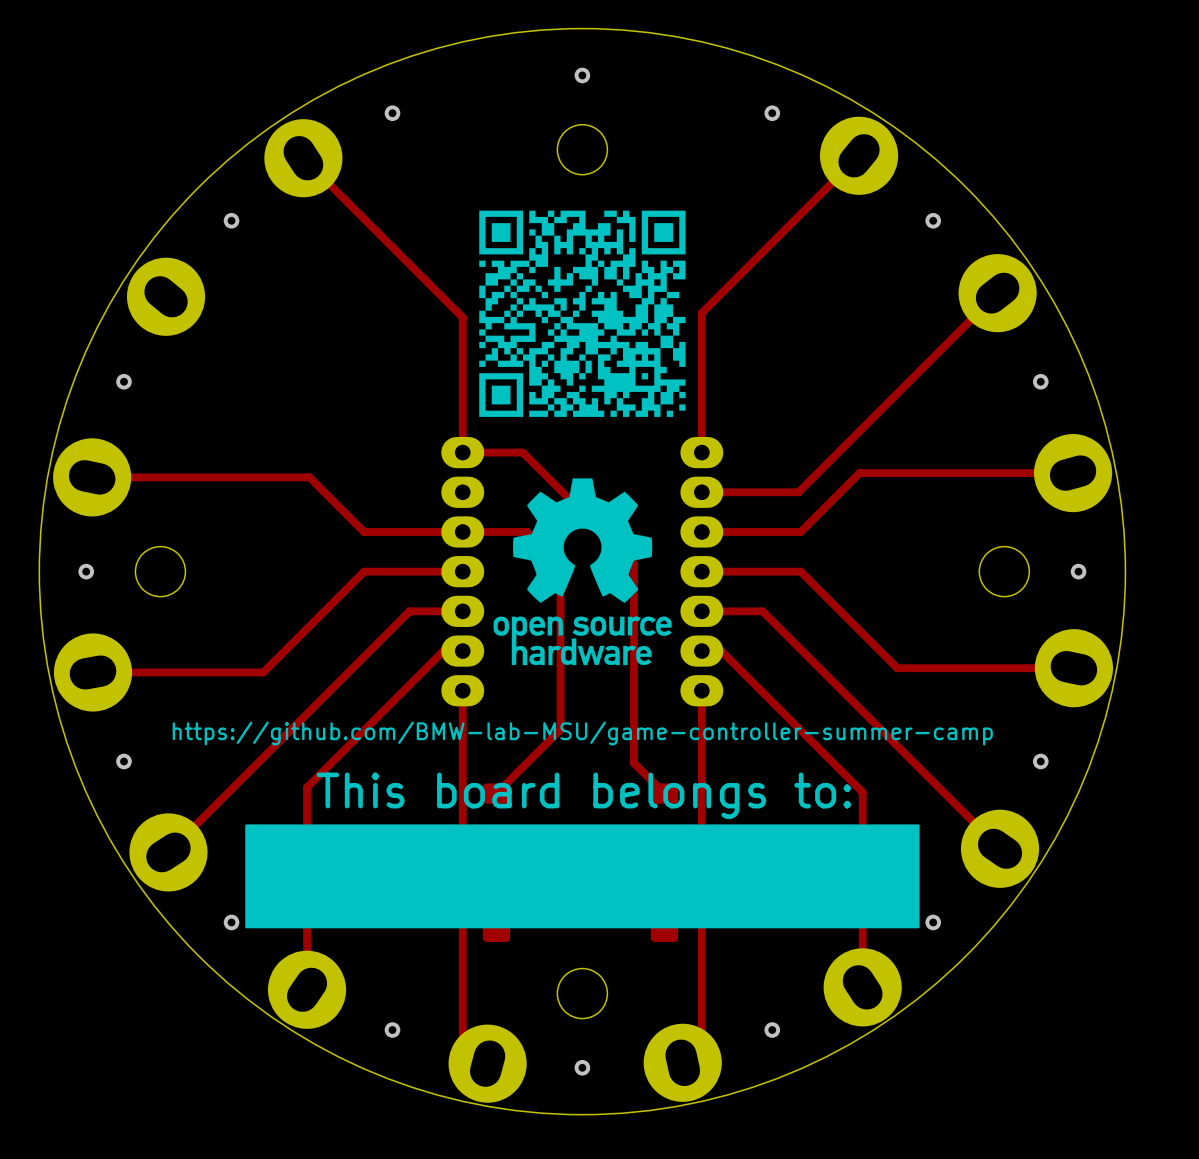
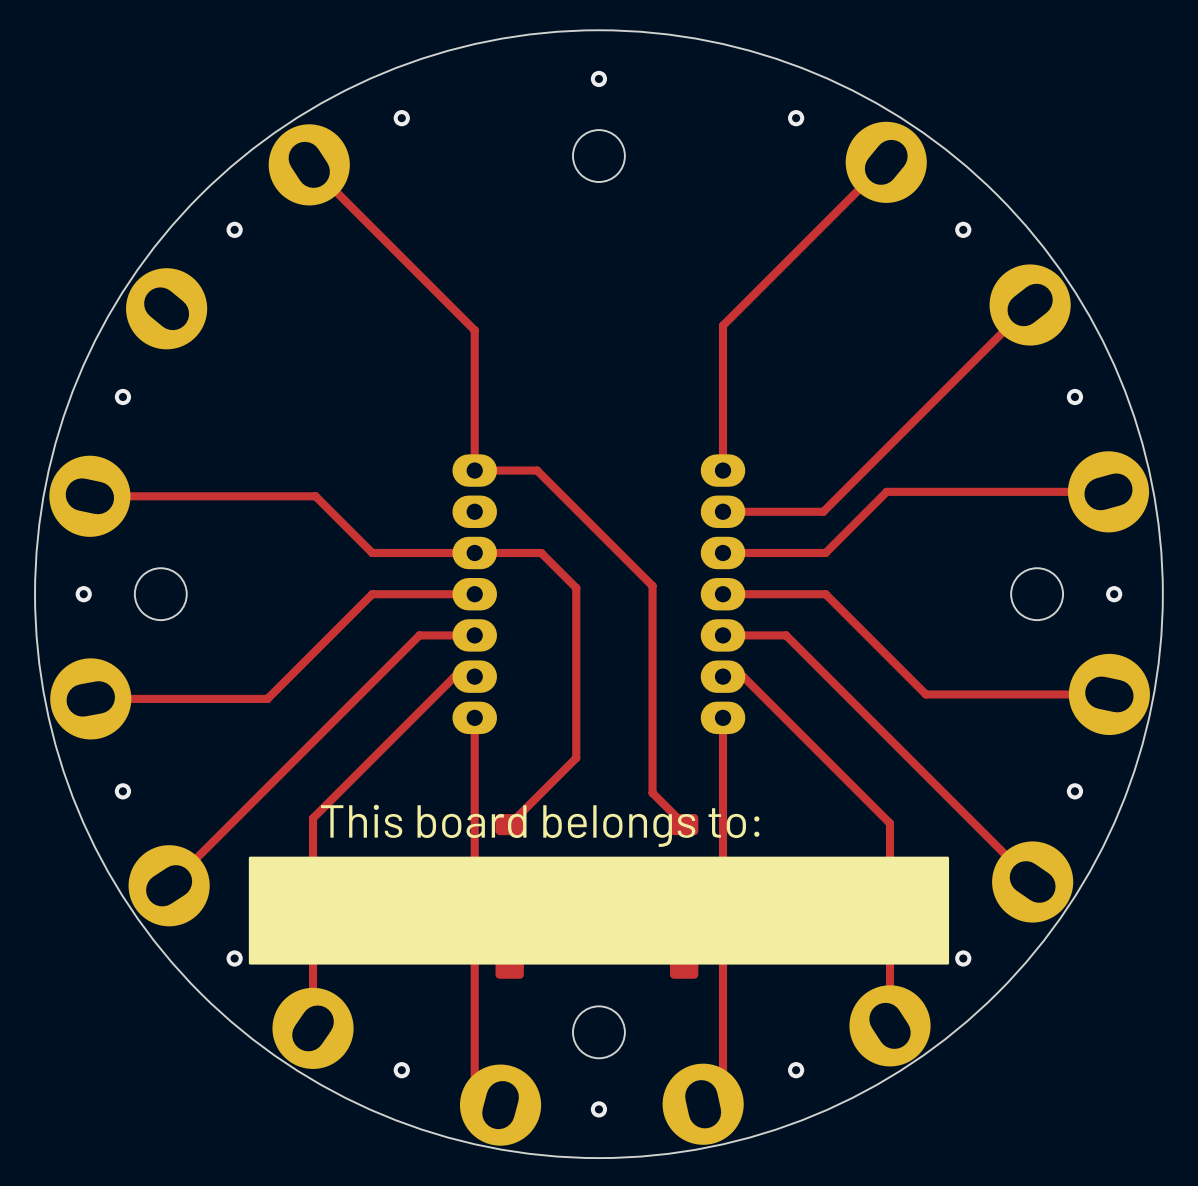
drawing: [479, 210, 686, 666] -> none

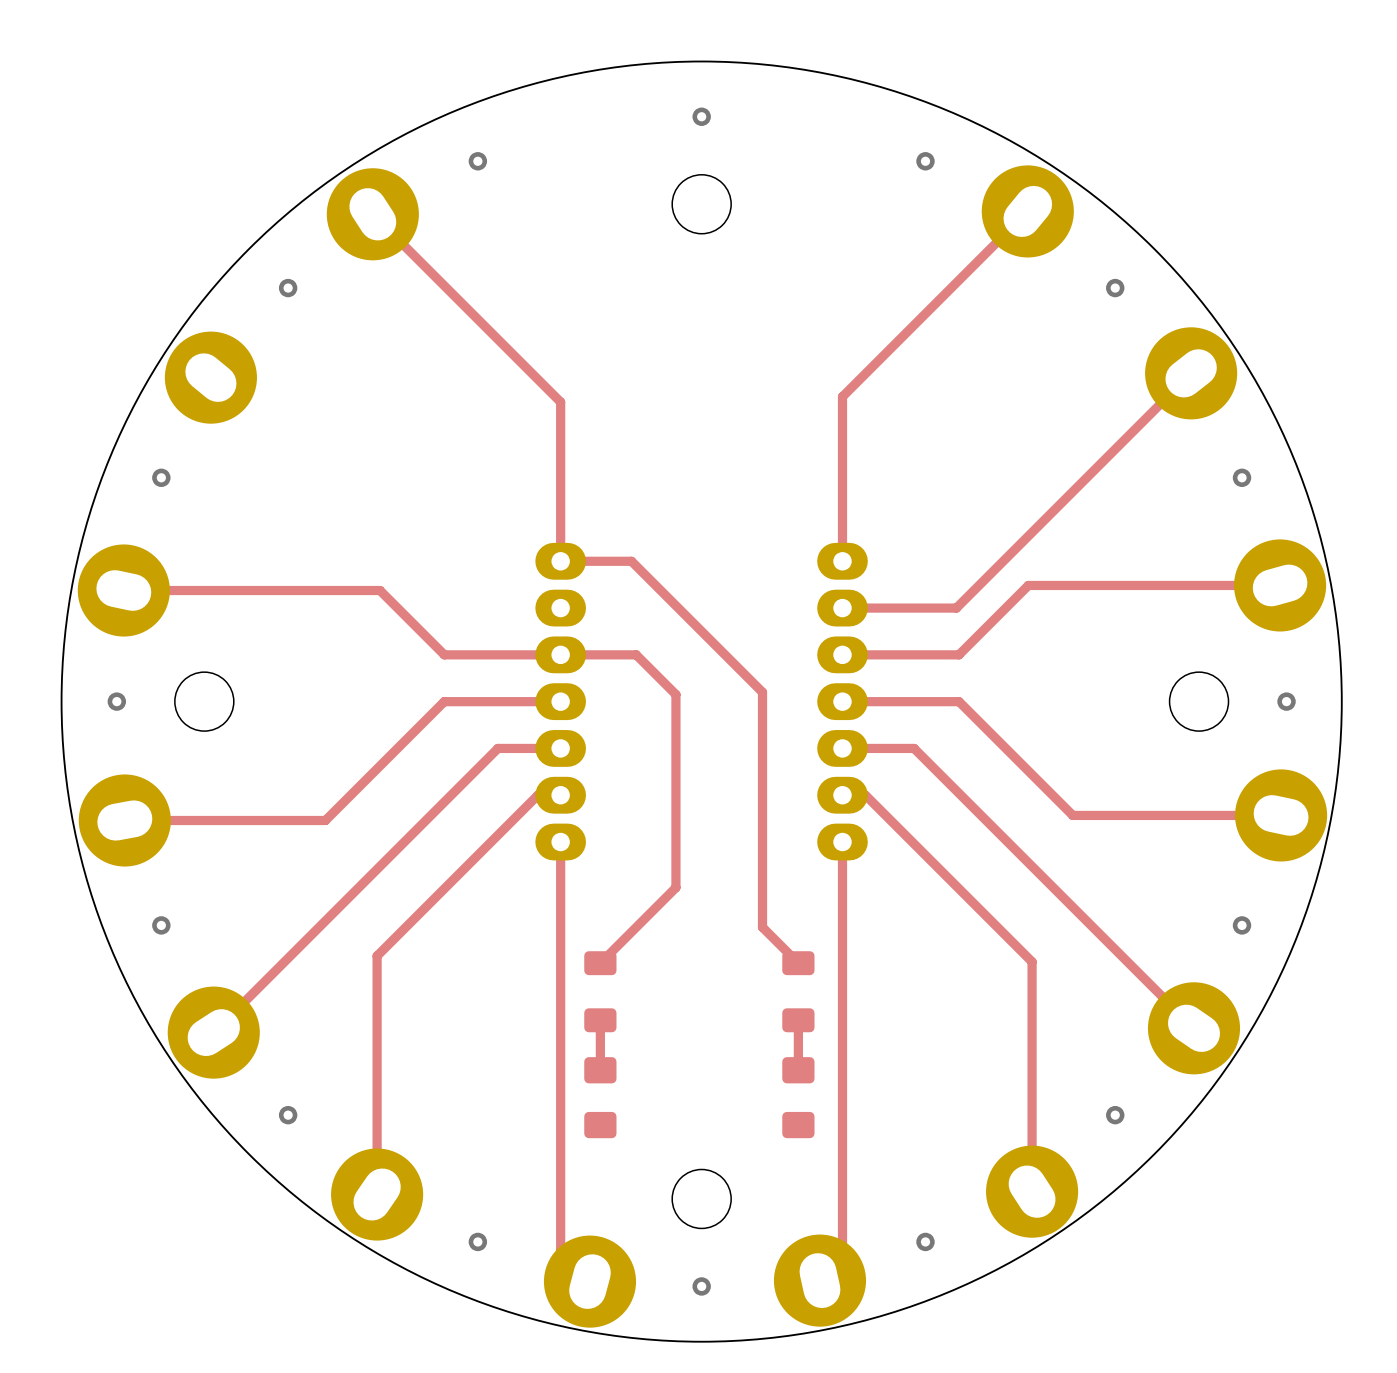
text: This board belongs to: (540, 825) -> none
drawing: [248, 856, 950, 965] -> none

